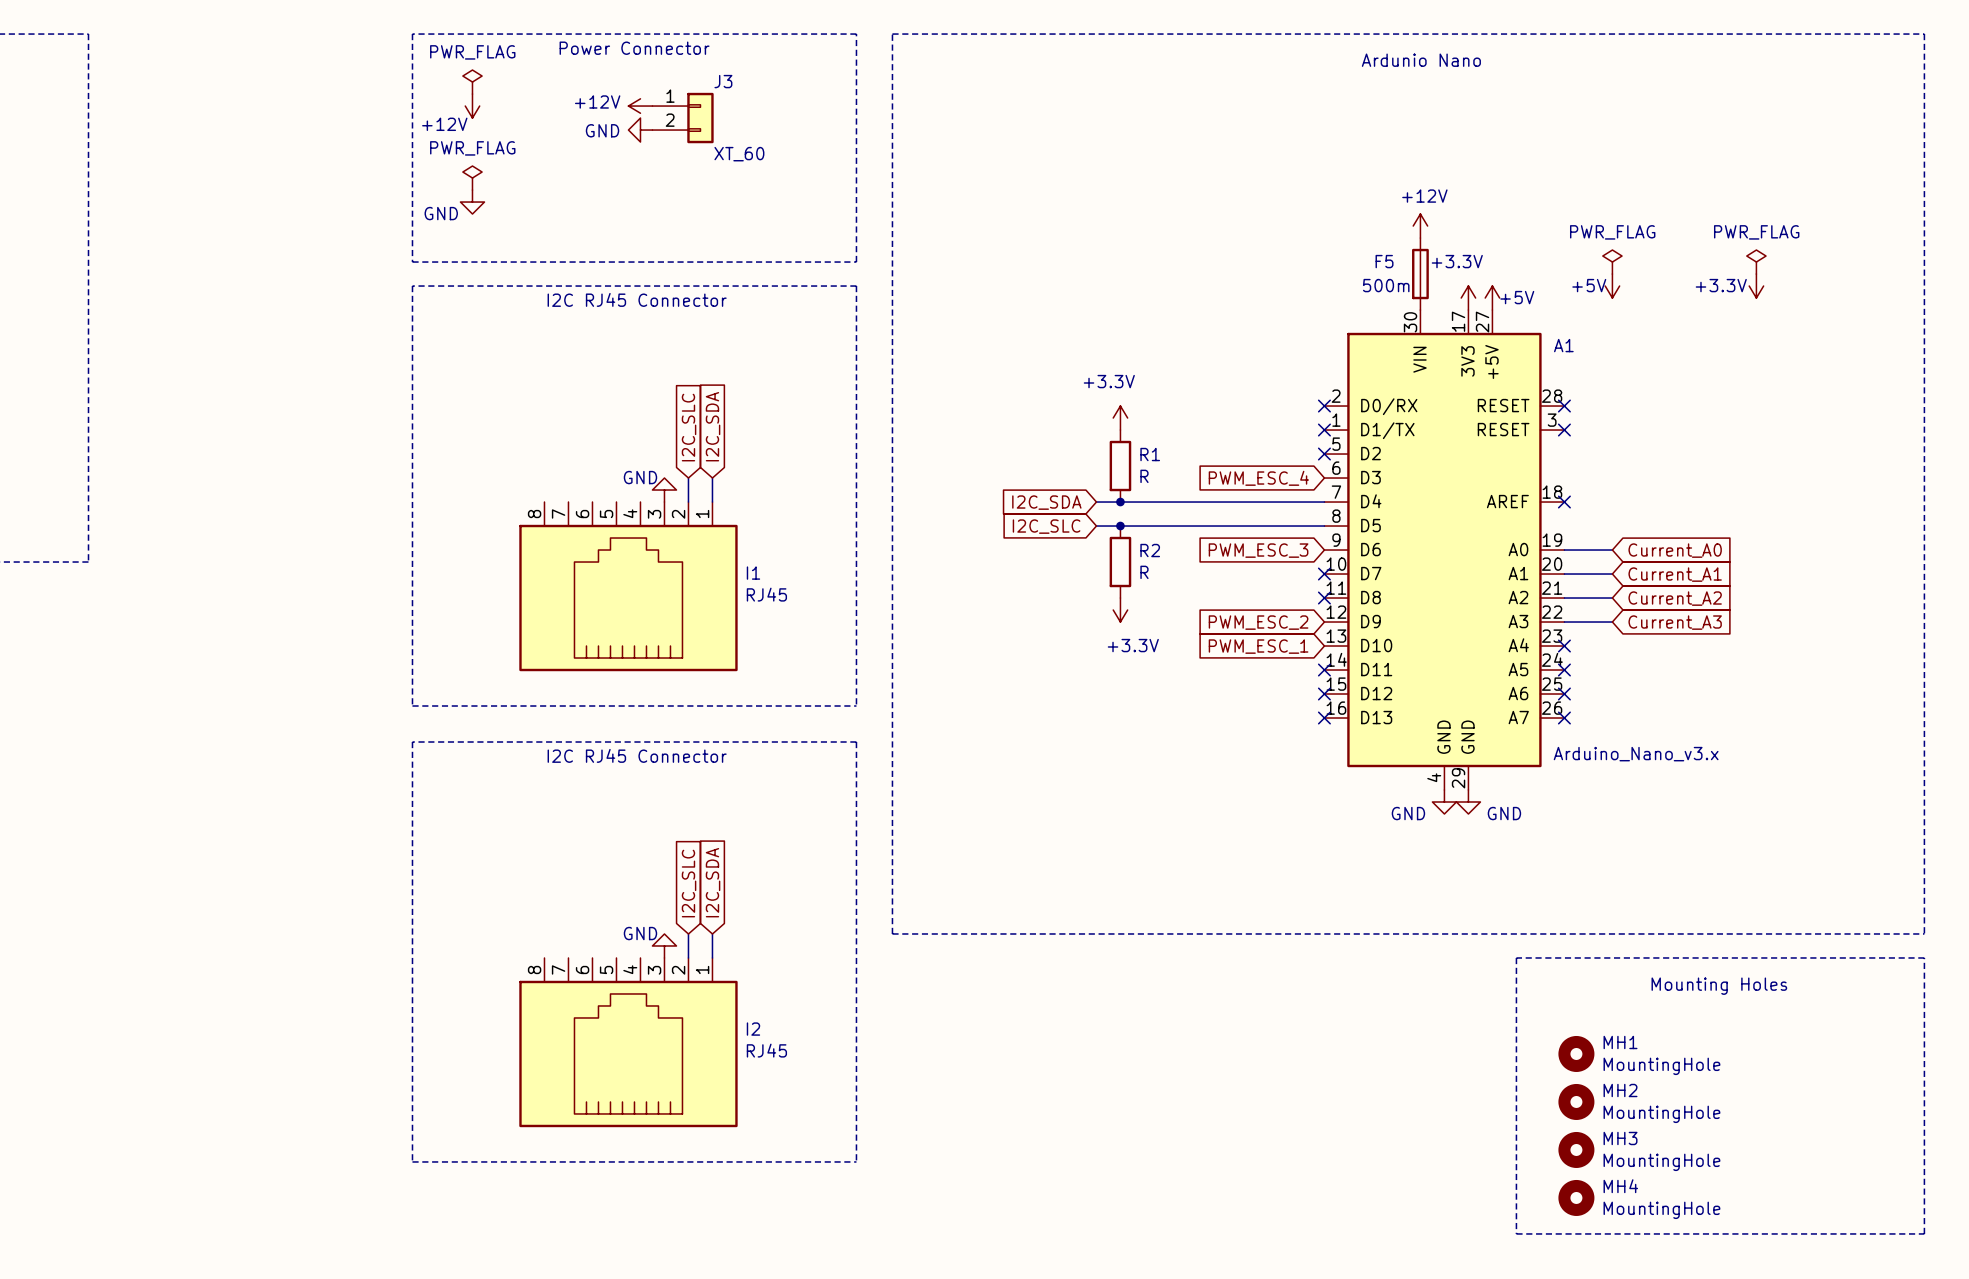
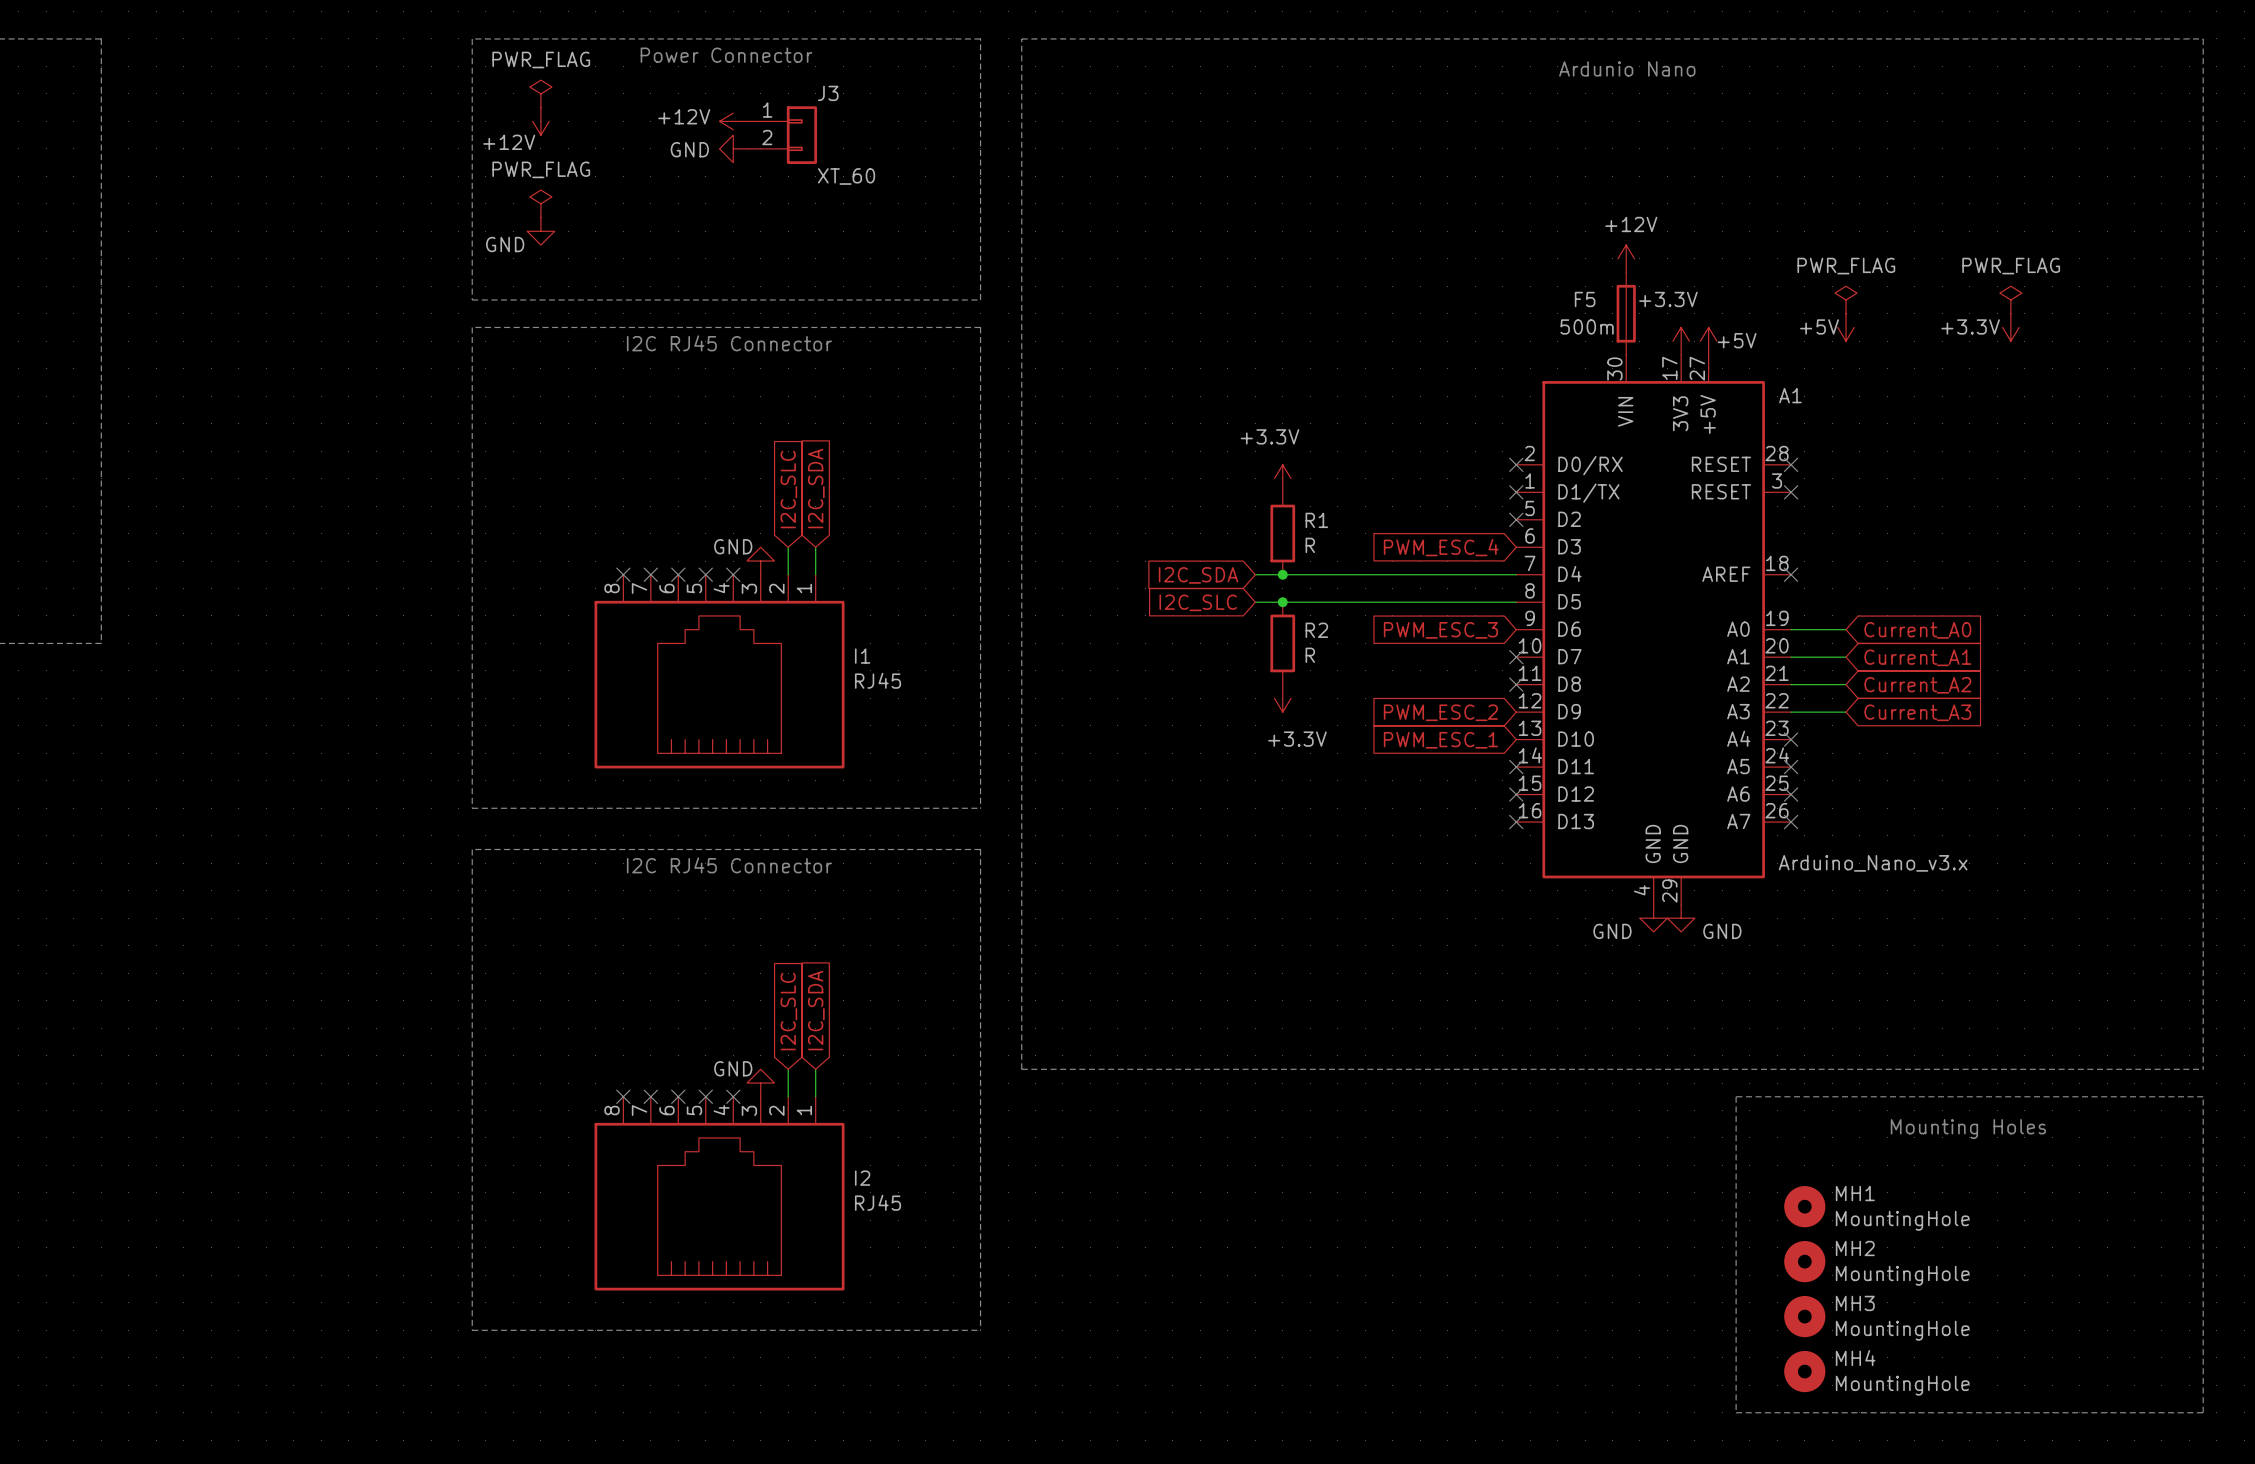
no-connect mark: none -> (623, 574)
no-connect mark: none -> (650, 574)
no-connect mark: none -> (678, 574)
no-connect mark: none -> (705, 574)
no-connect mark: none -> (733, 574)
no-connect mark: none -> (623, 1096)
no-connect mark: none -> (650, 1096)
no-connect mark: none -> (678, 1096)
no-connect mark: none -> (705, 1096)
no-connect mark: none -> (733, 1096)

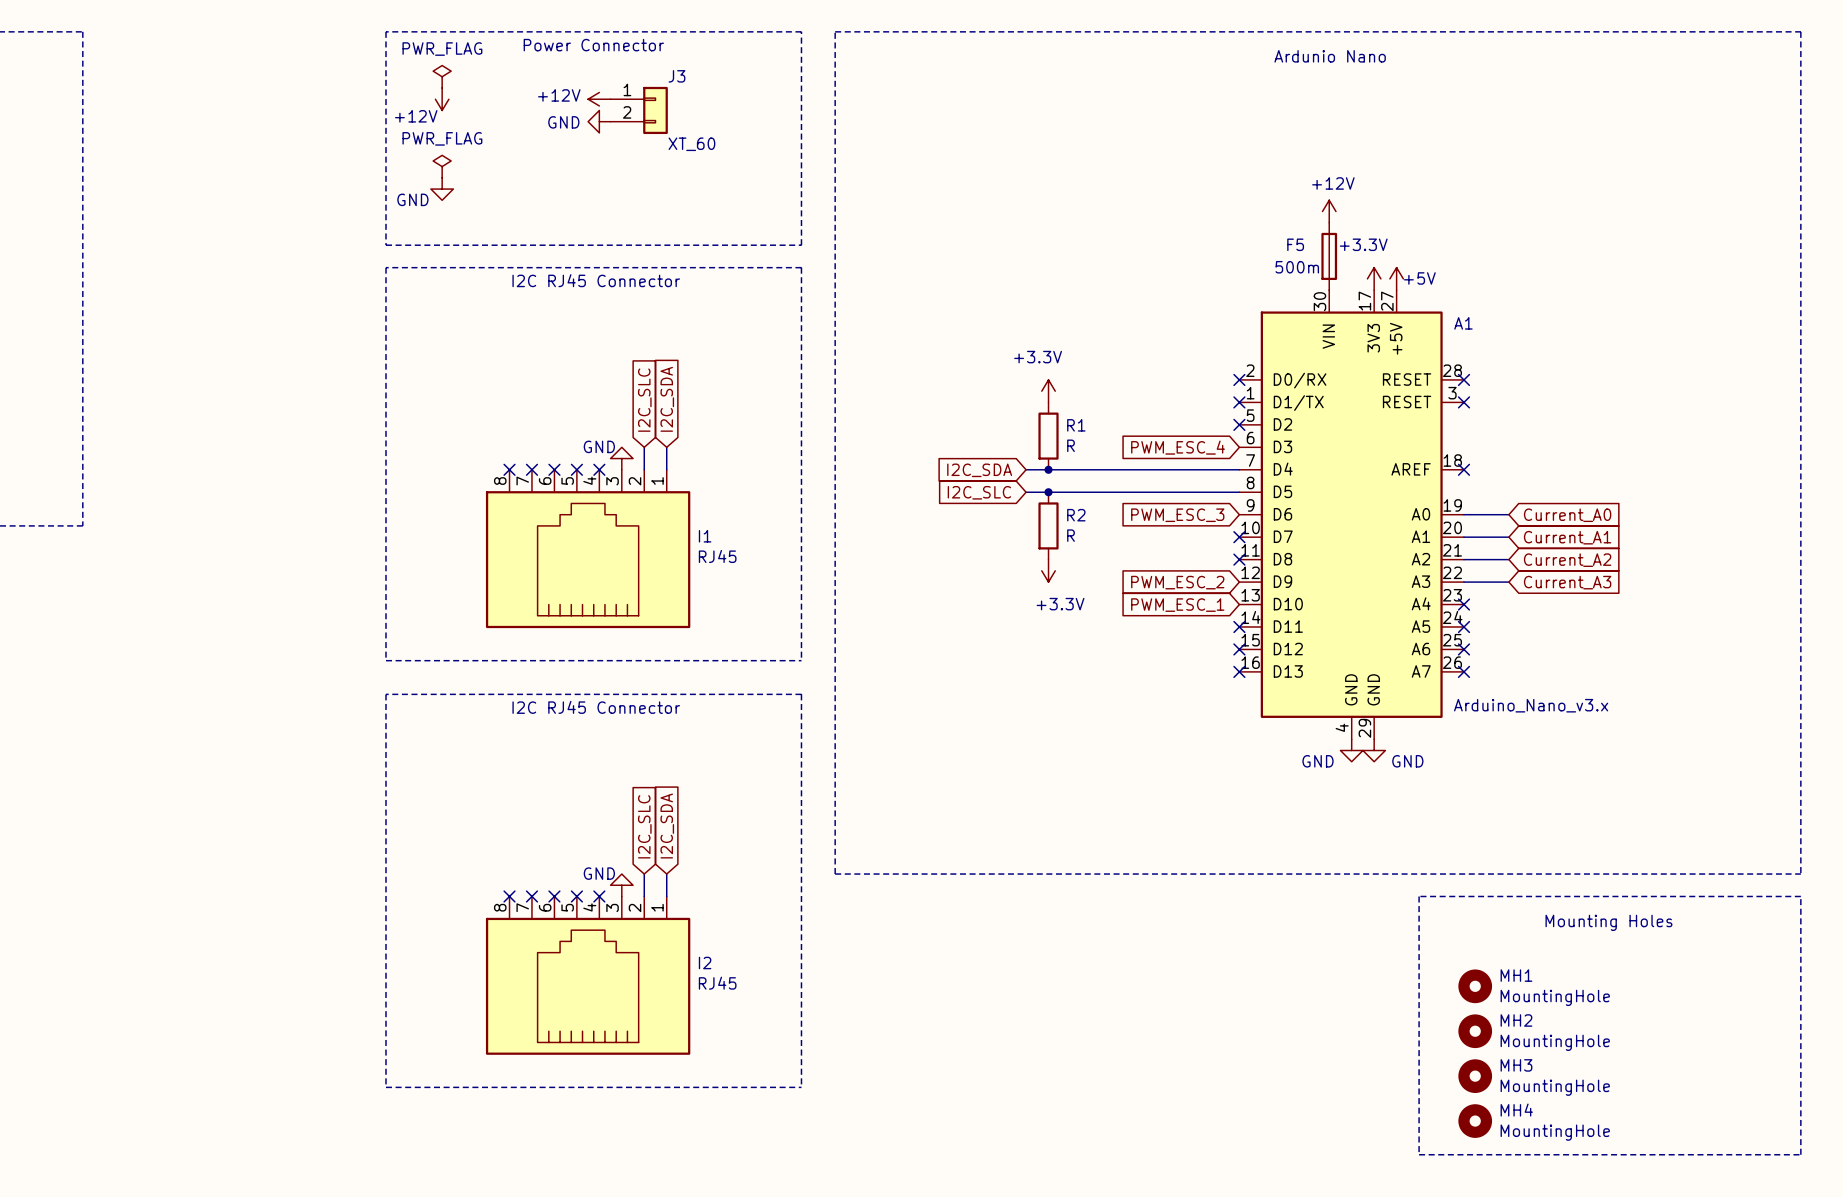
power symbol: PWR_FLAG (1846, 299) -> none
power symbol: PWR_FLAG (2010, 299) -> none
power symbol: +5V (1846, 327) -> none
power symbol: +3.3V (2010, 327) -> none

